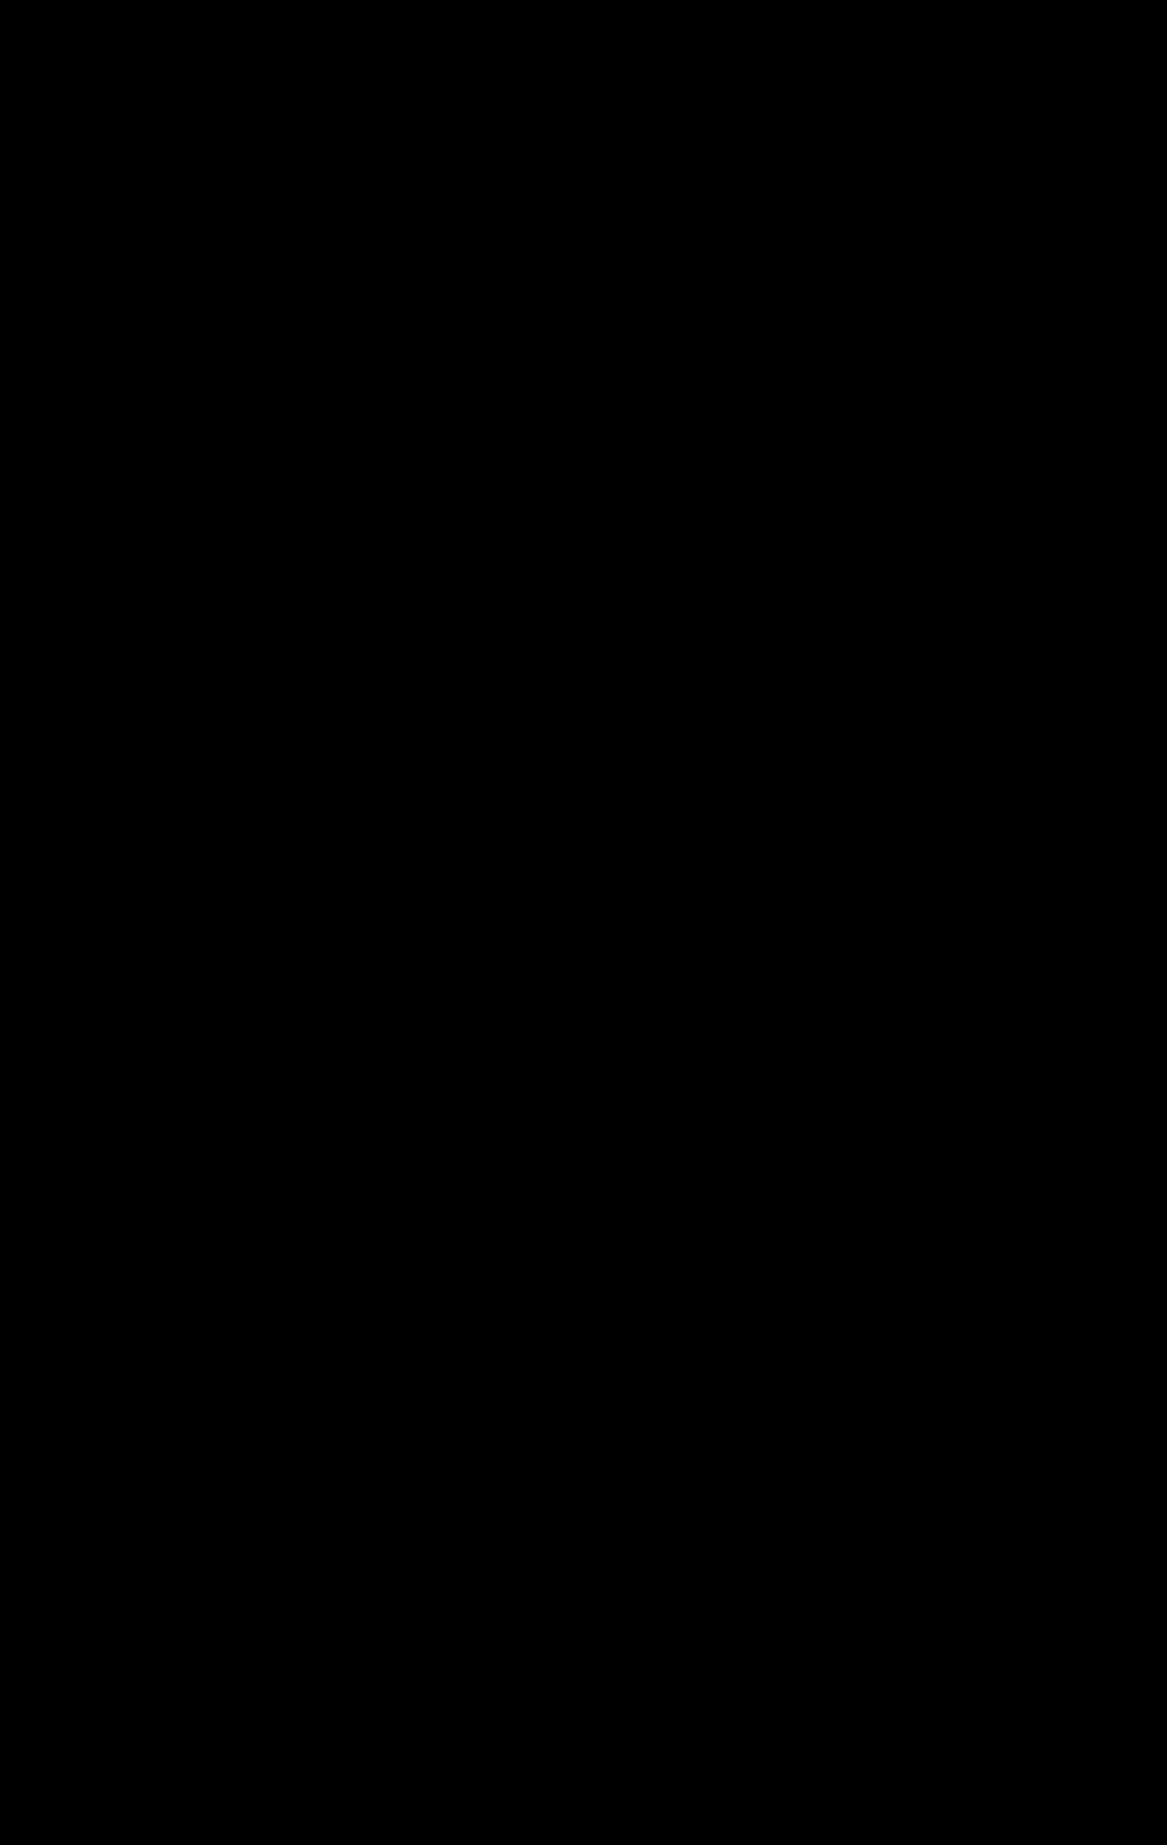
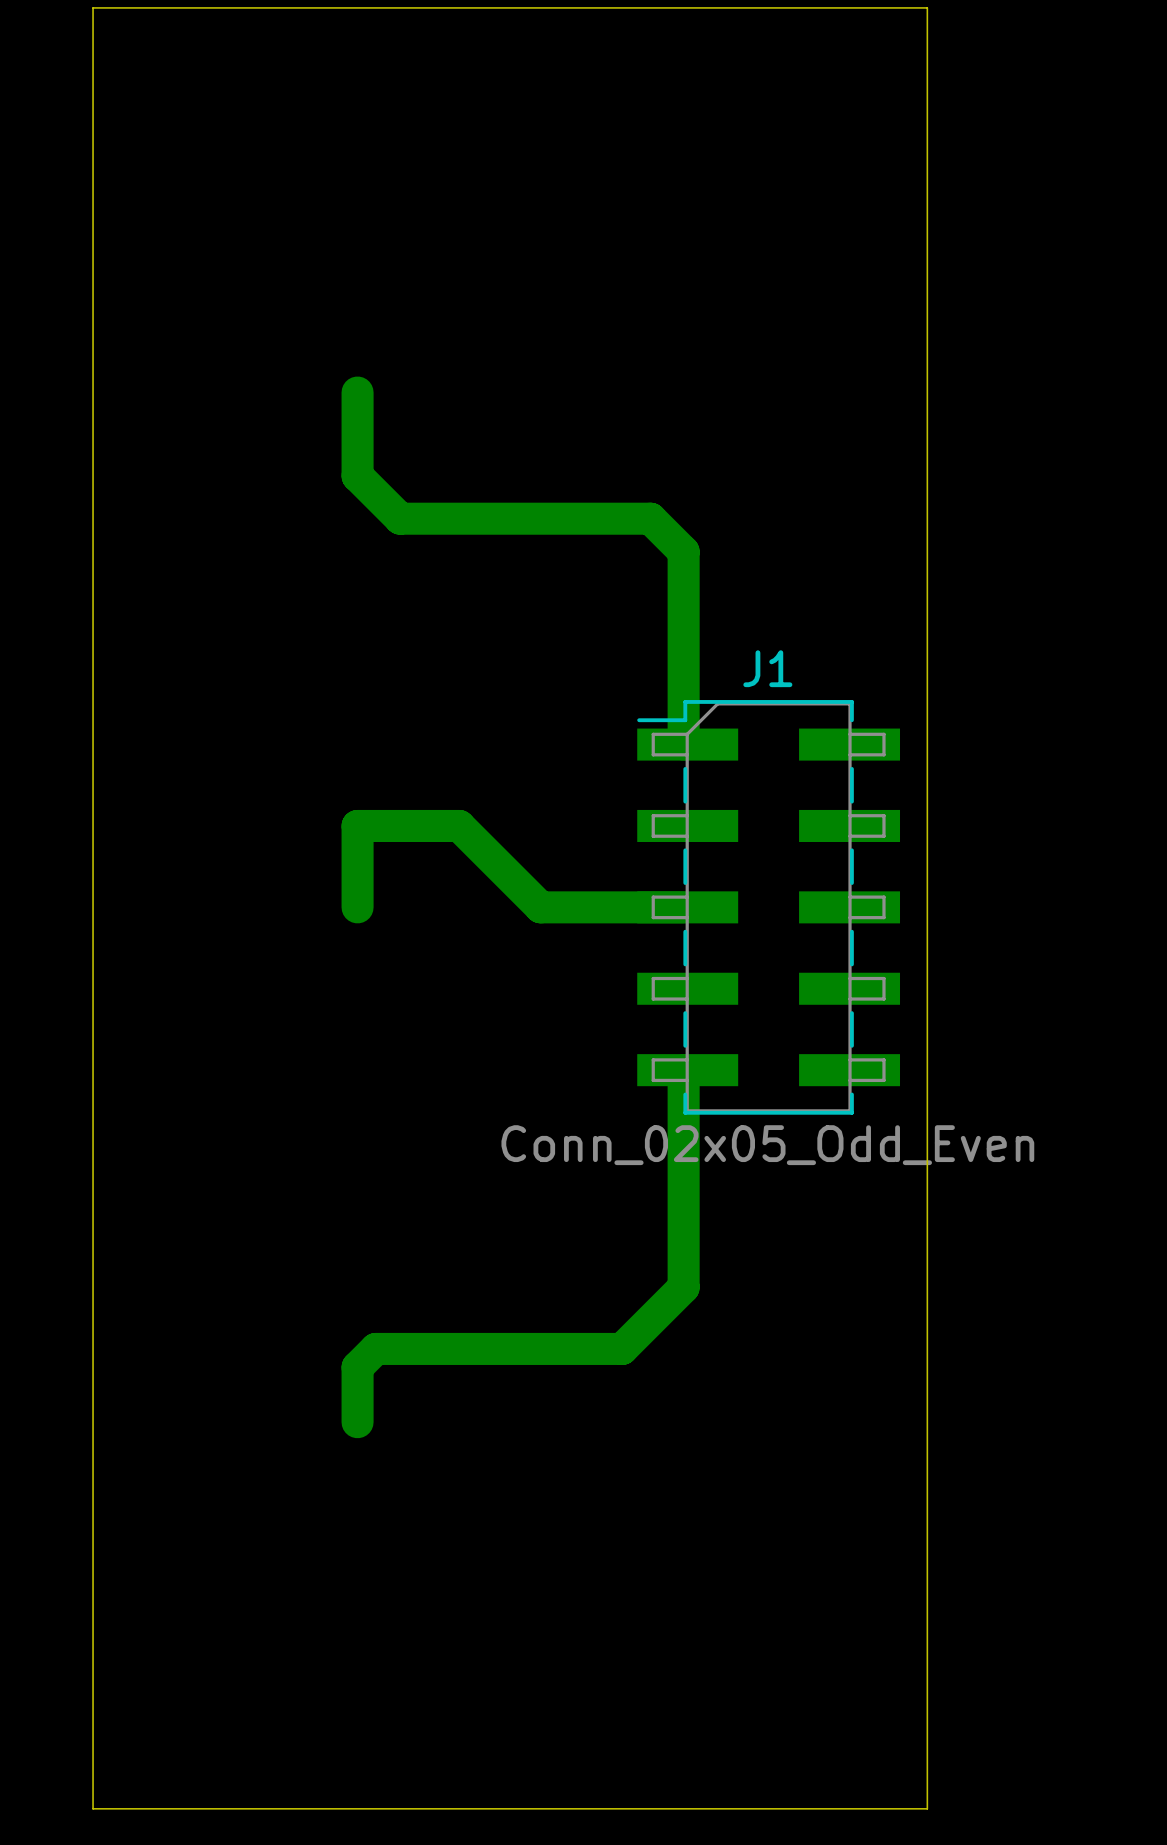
board edge: none -> (927, 7) (93, 7) (93, 1808) (927, 1808) (927, 7)
track: none -> (357, 392) (357, 475) (400, 518) (650, 518) (683, 551) (683, 744)
track: none -> (683, 907) (540, 907) (459, 825) (357, 825) (357, 907)
J1: none -> Conn_02x05_Odd_Even (768, 907)
track: none -> (683, 1070) (683, 1287) (622, 1348) (375, 1348) (357, 1367) (357, 1422)

